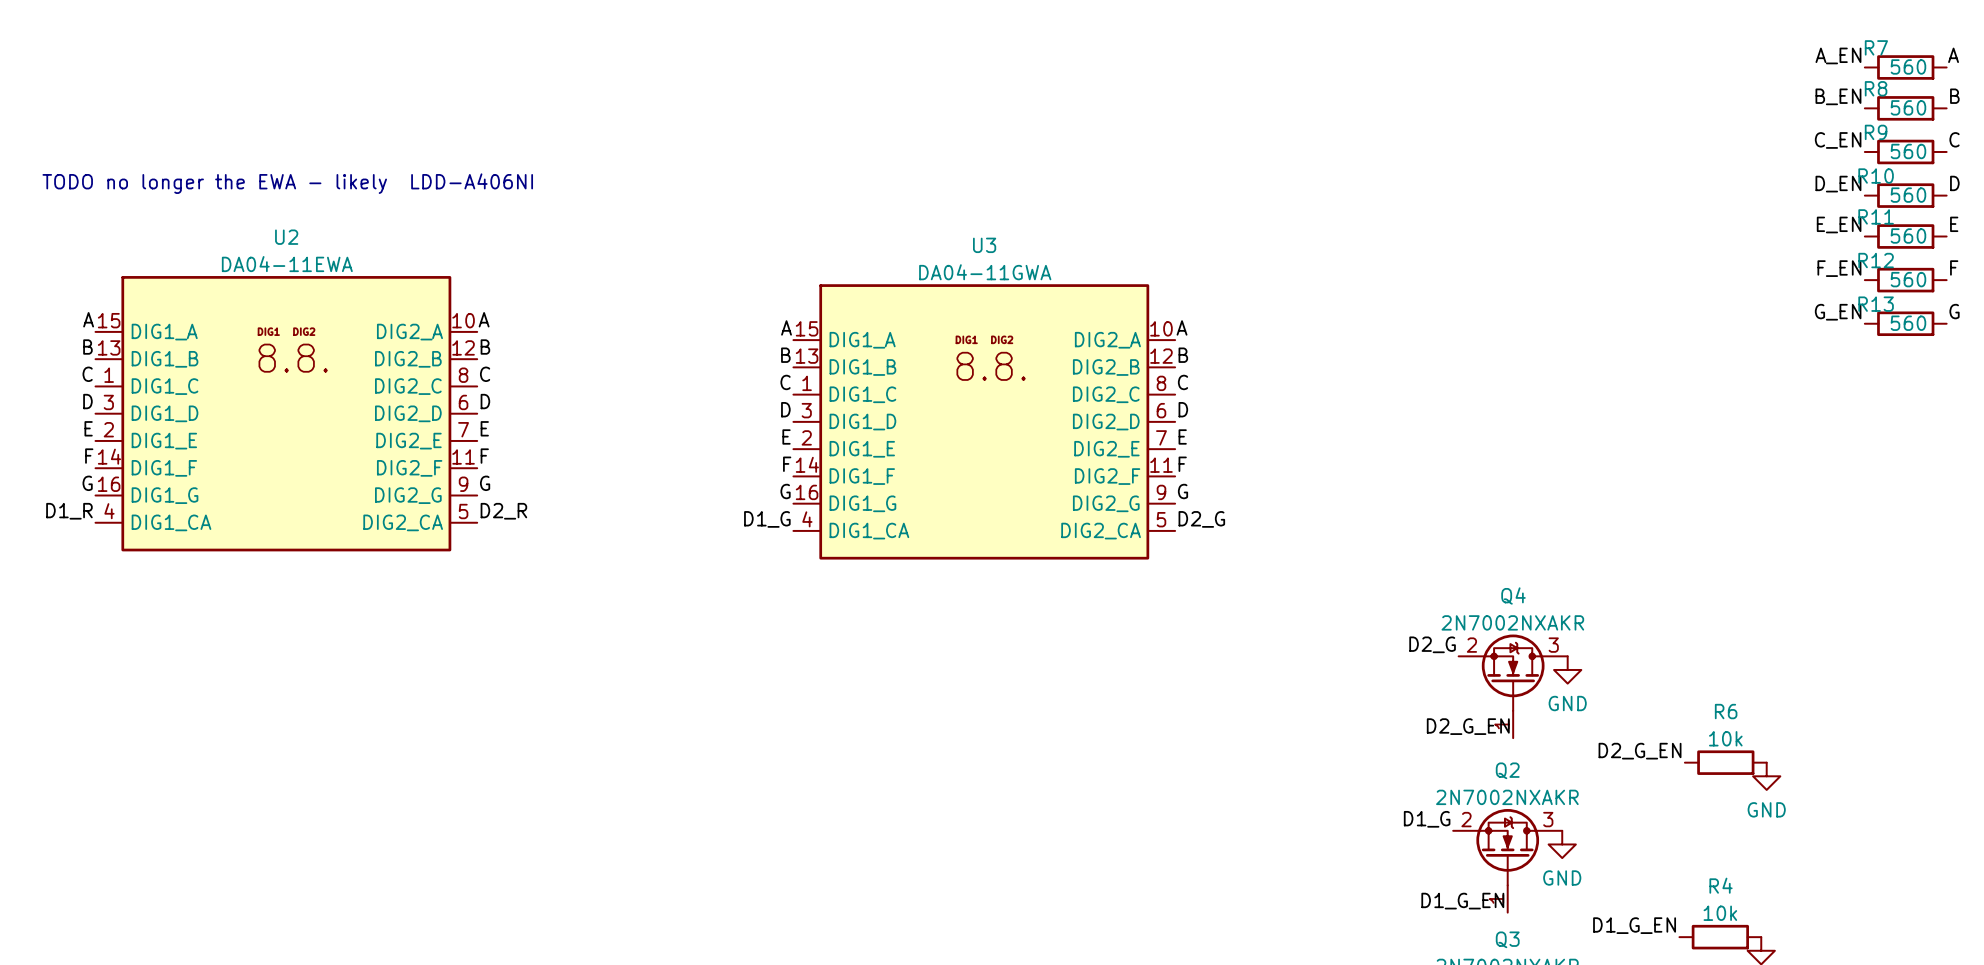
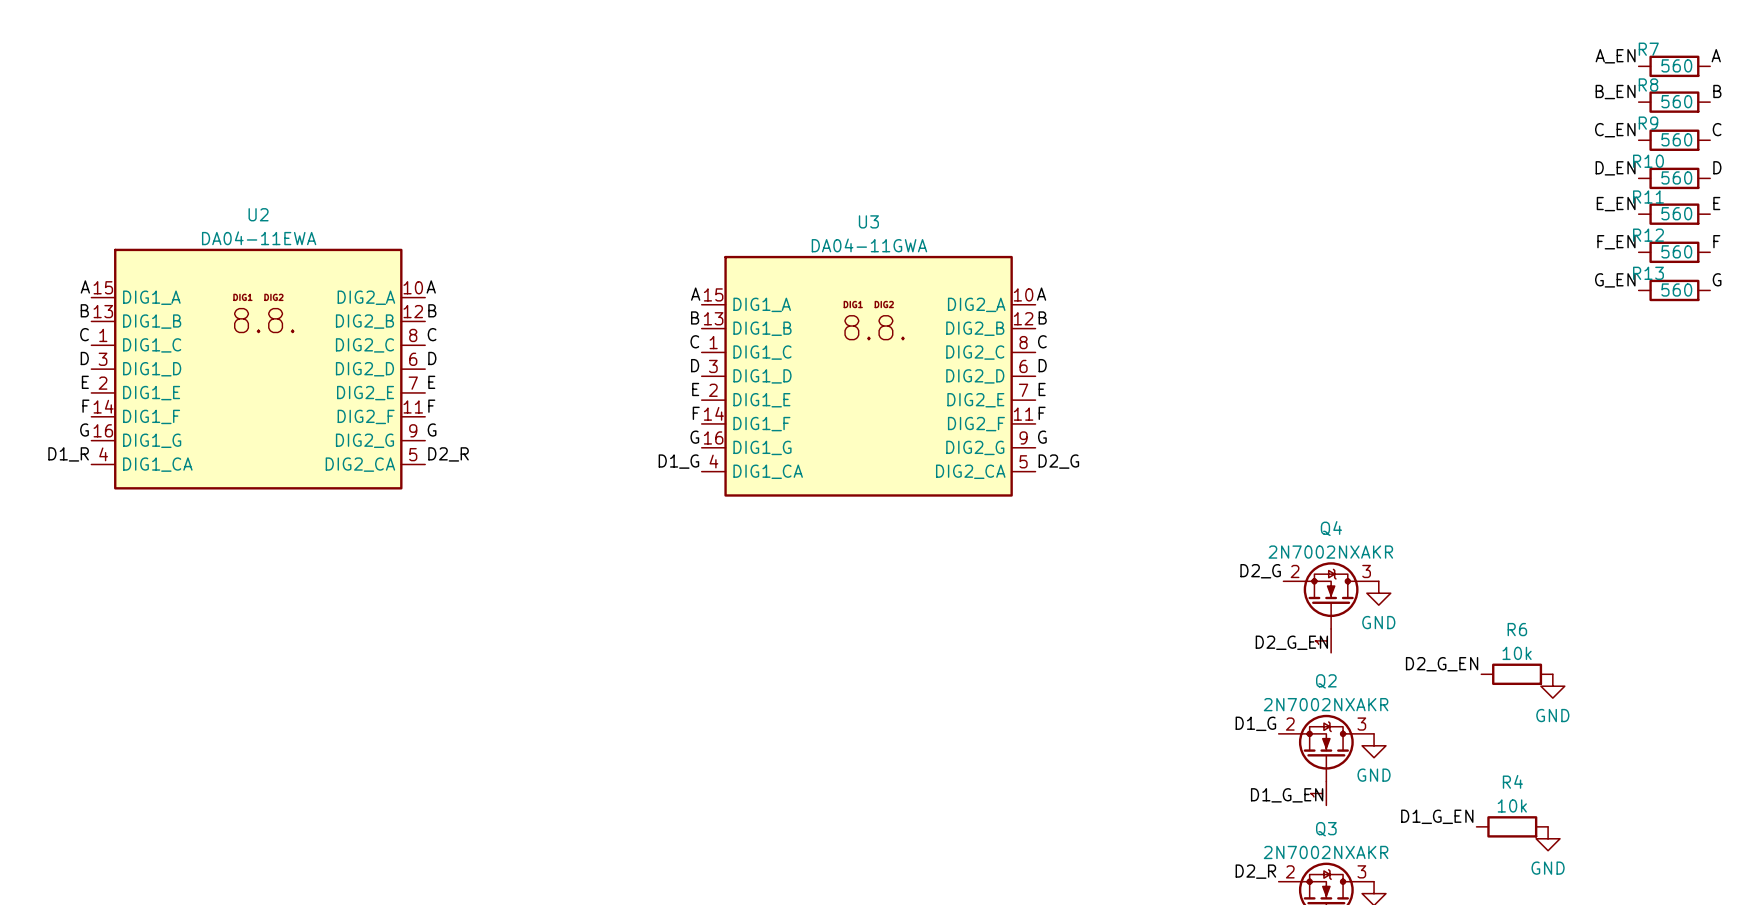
text: TODO no longer the EWA - likely LDD-A406NI (287, 183) -> none

